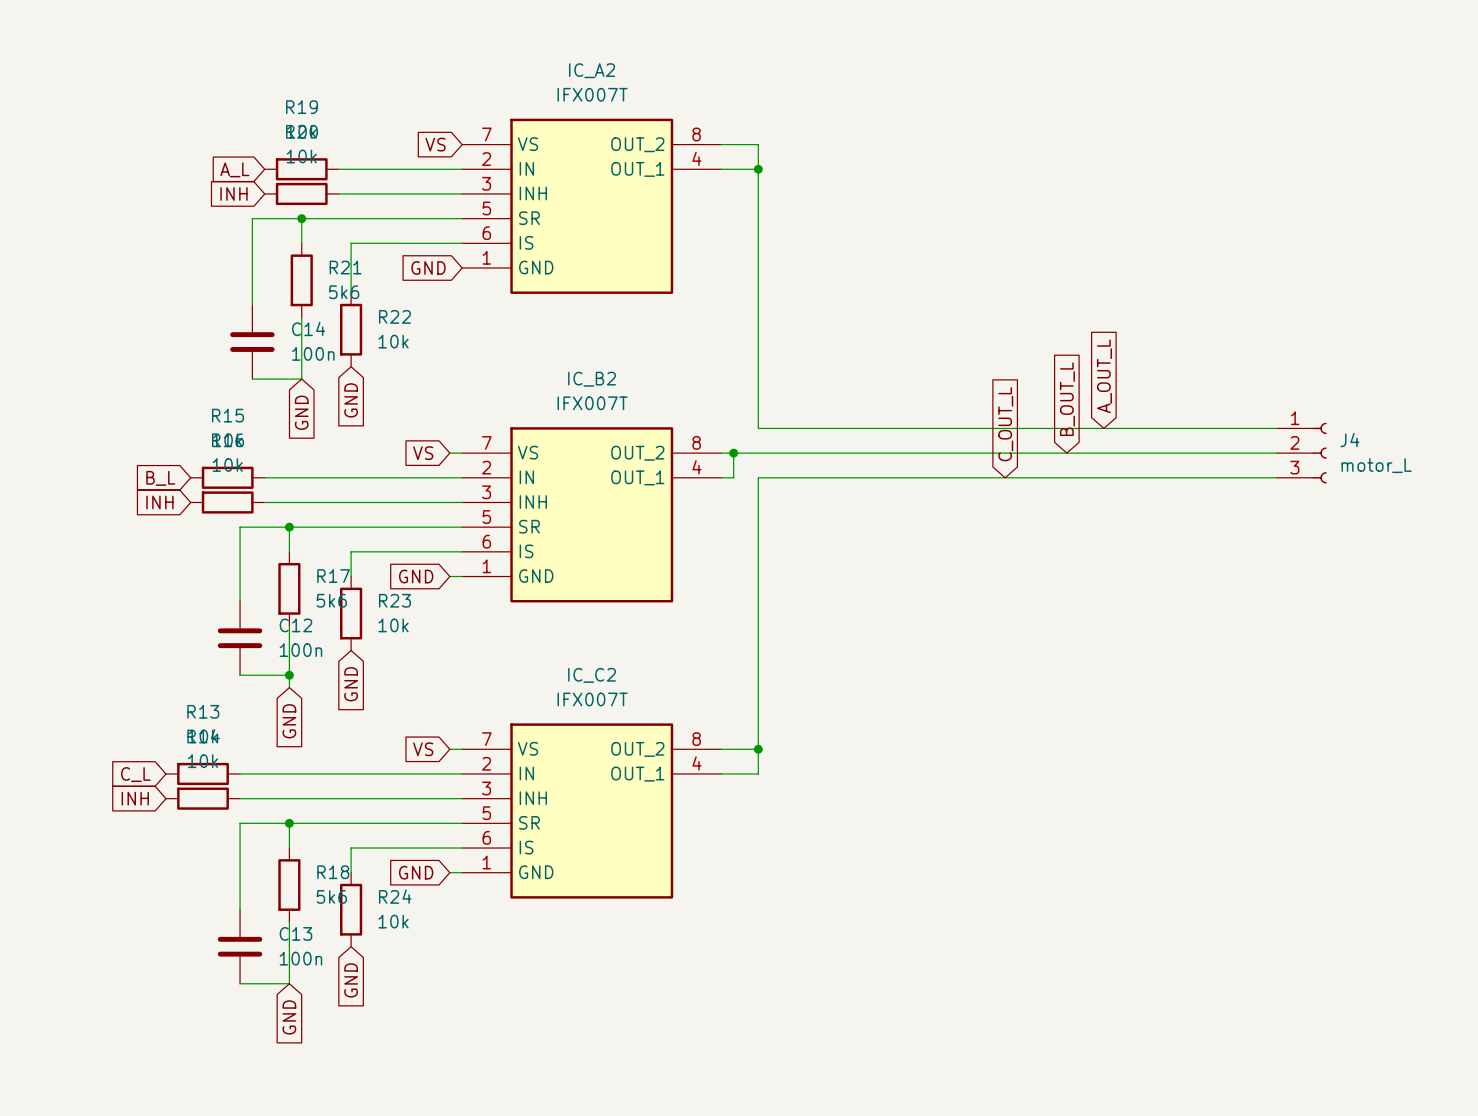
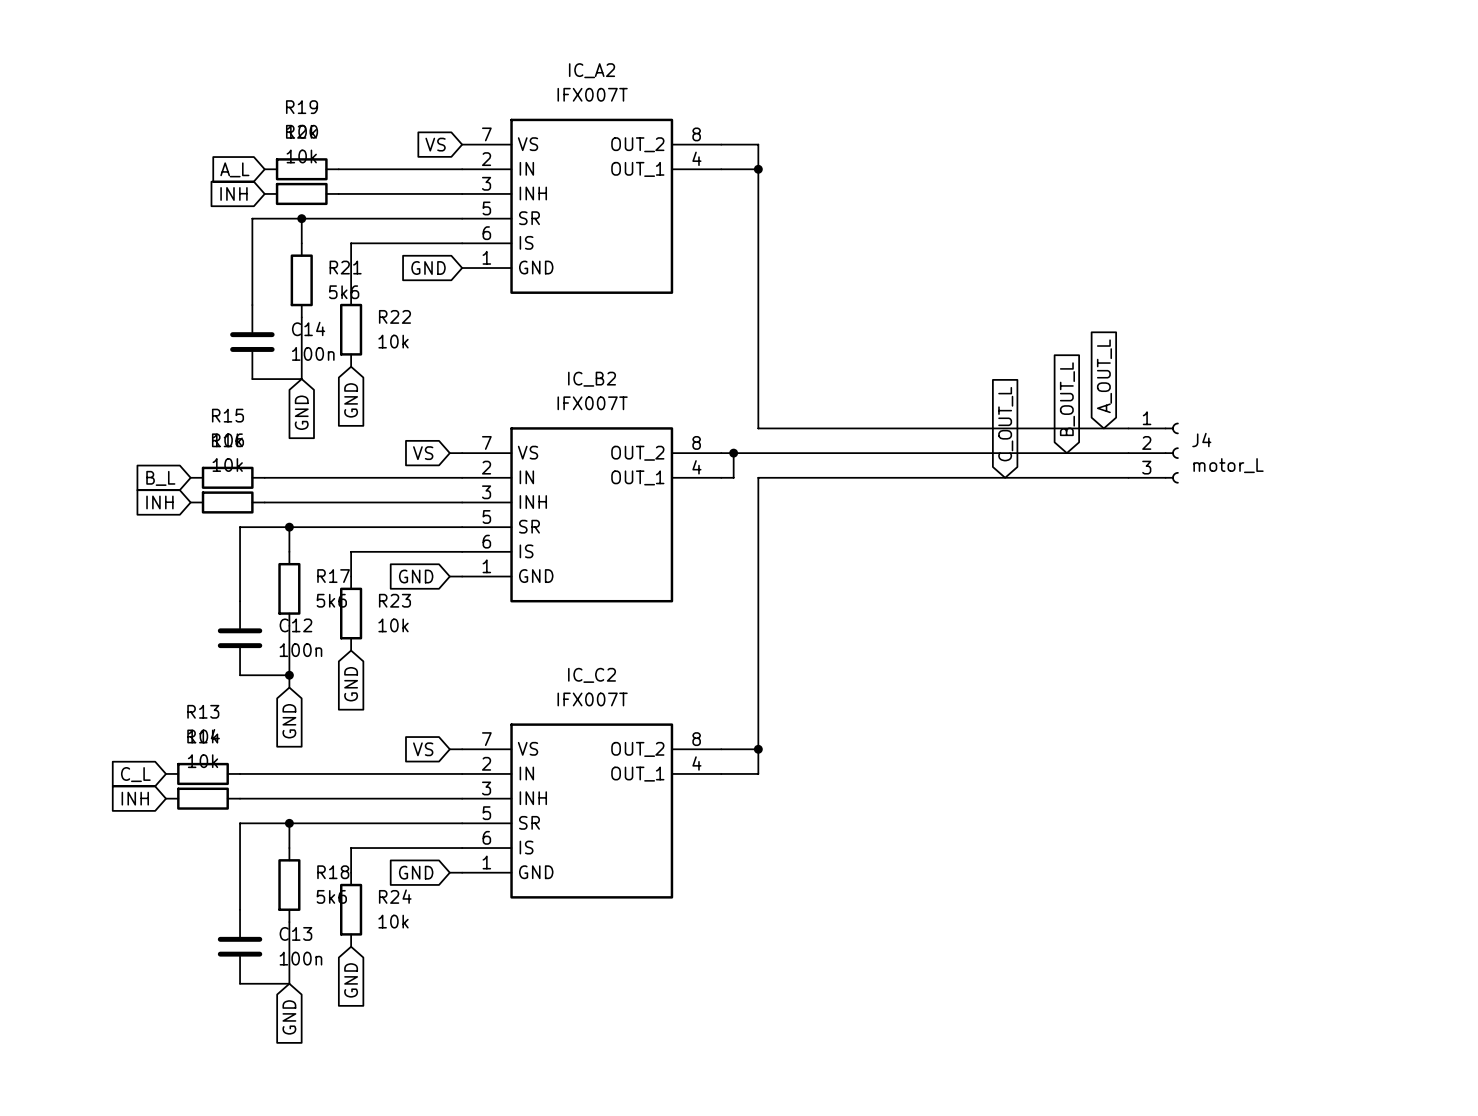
wire: (1128, 428) (1276, 428) -> none
wire: (1128, 453) (1276, 453) -> none
J4 position: (1301, 453) -> (1153, 453)
wire: (1128, 477) (1276, 477) -> none

